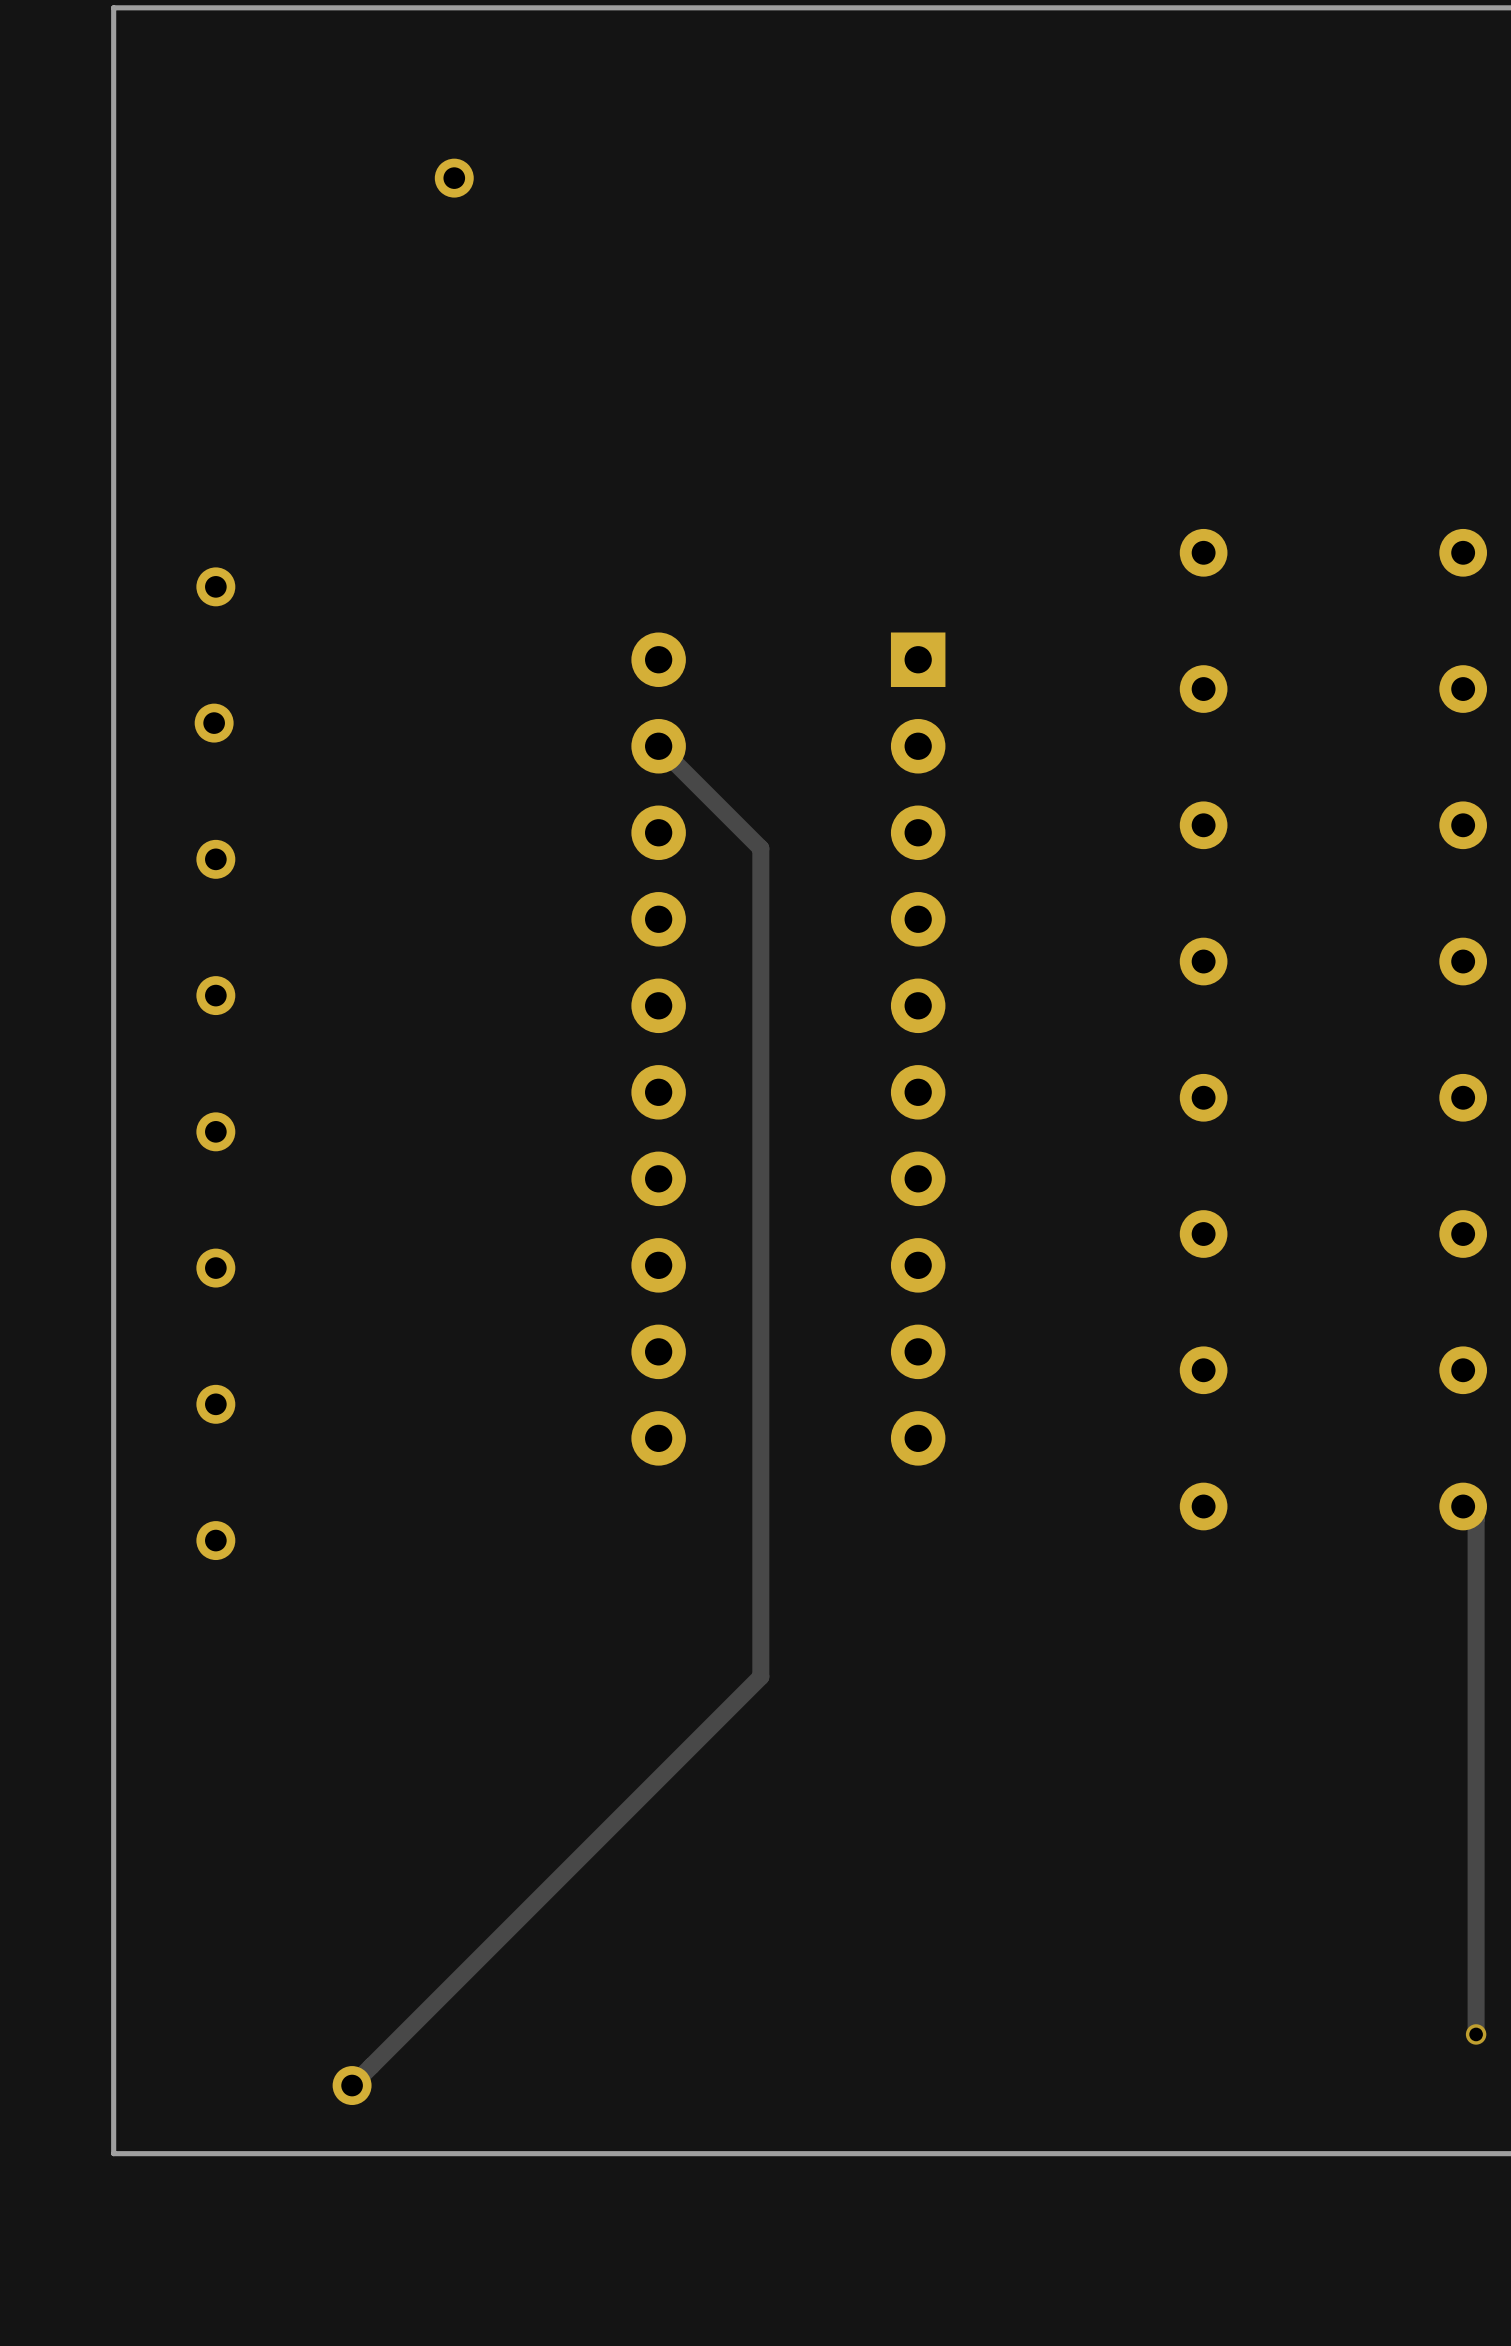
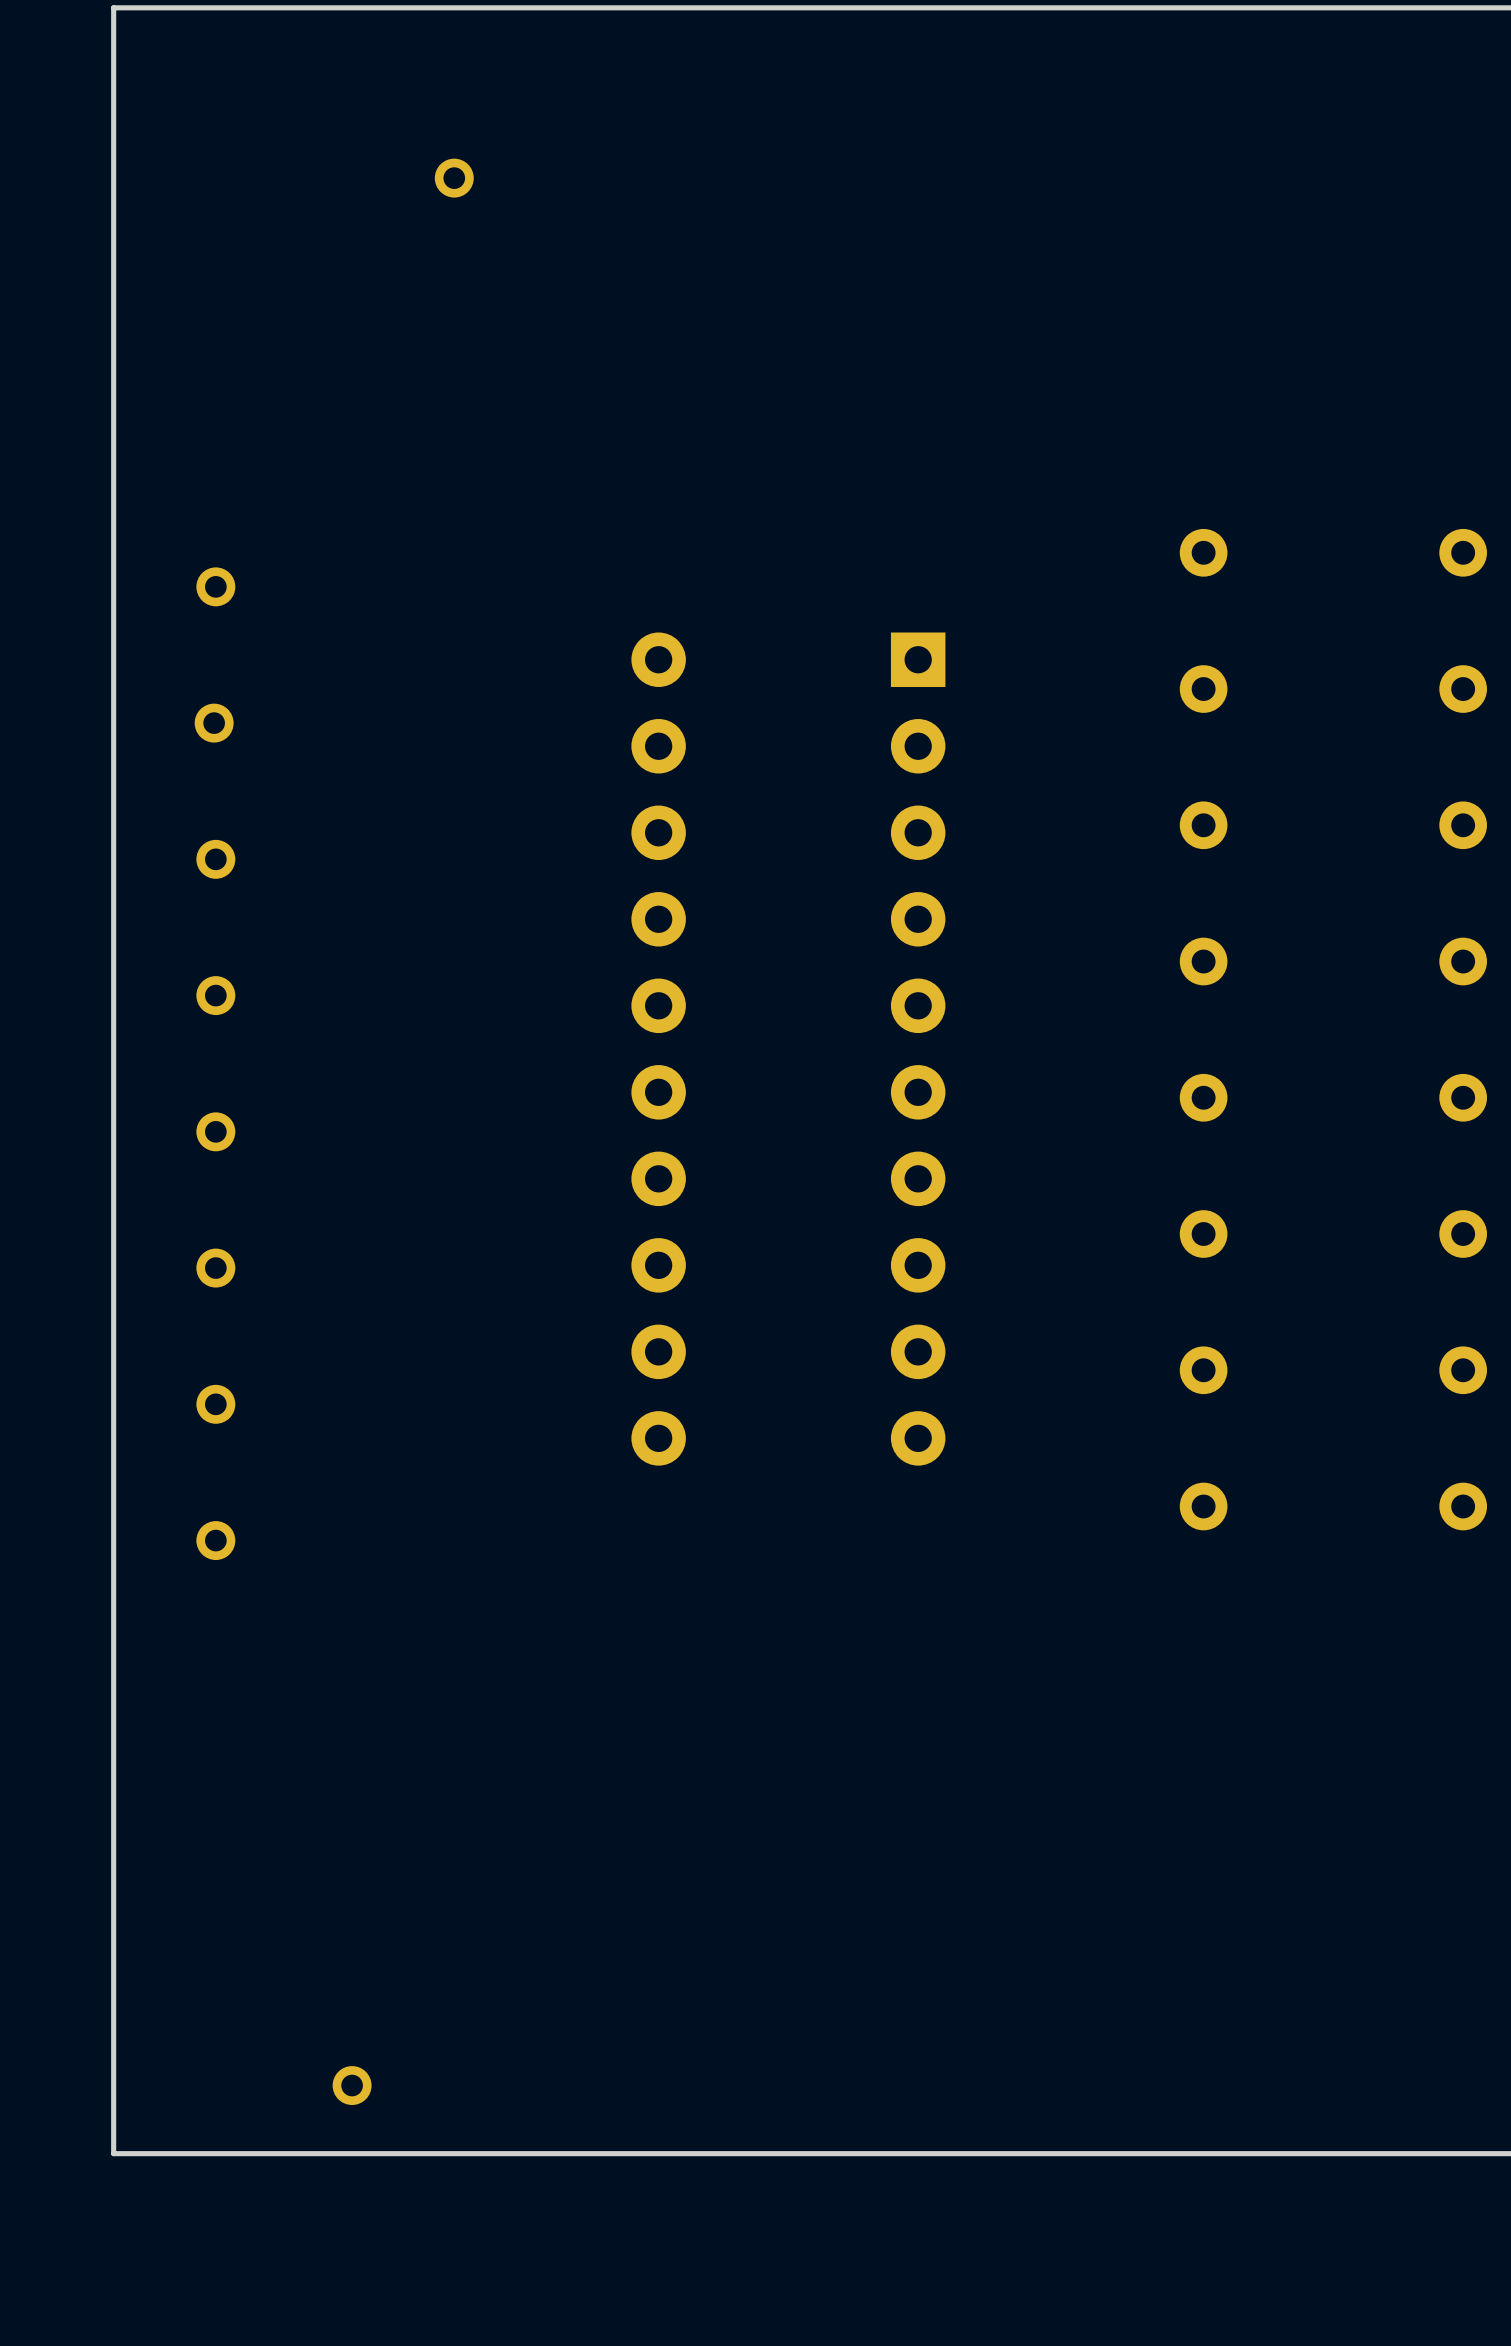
track: (658, 746) (760, 848) (760, 1676) (352, 2085) -> none
track: (1463, 1506) (1476, 1519) (1476, 2034) -> none
via: (1476, 2034) -> none

